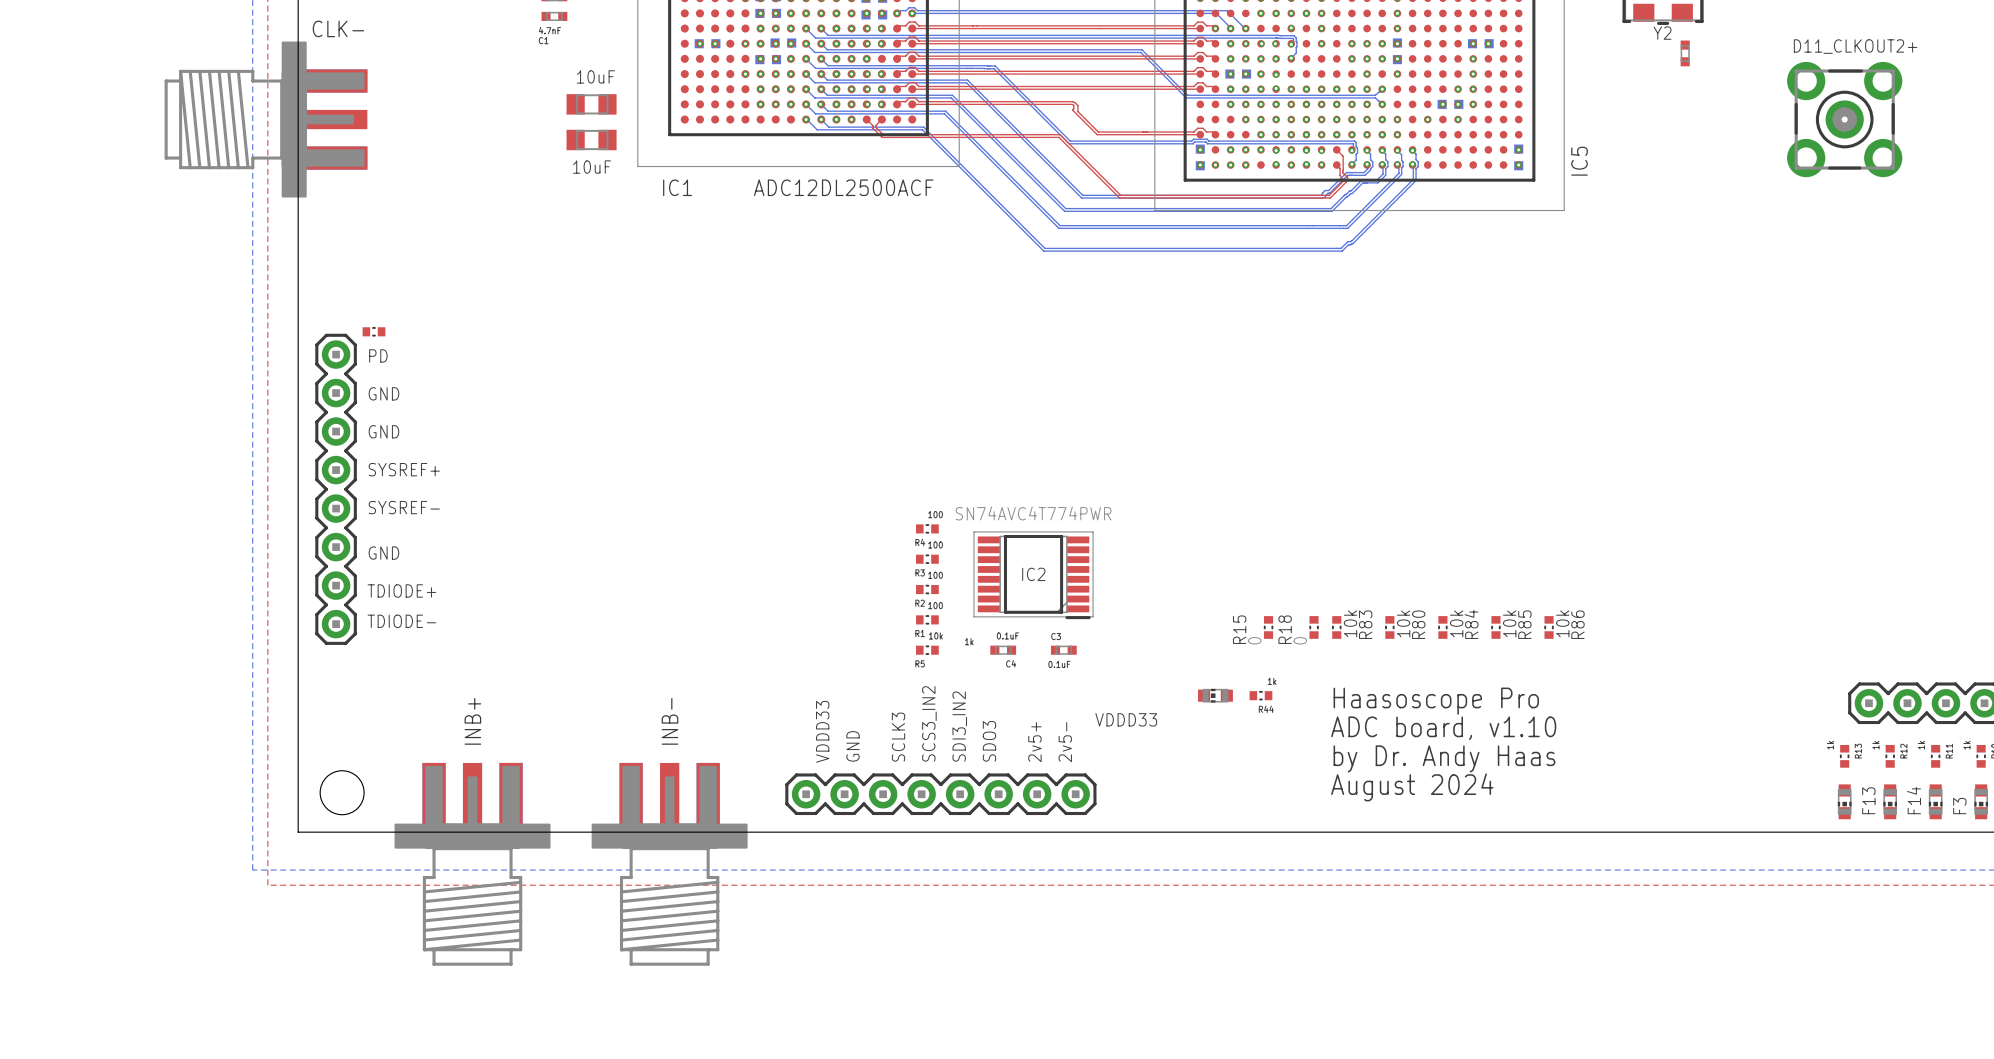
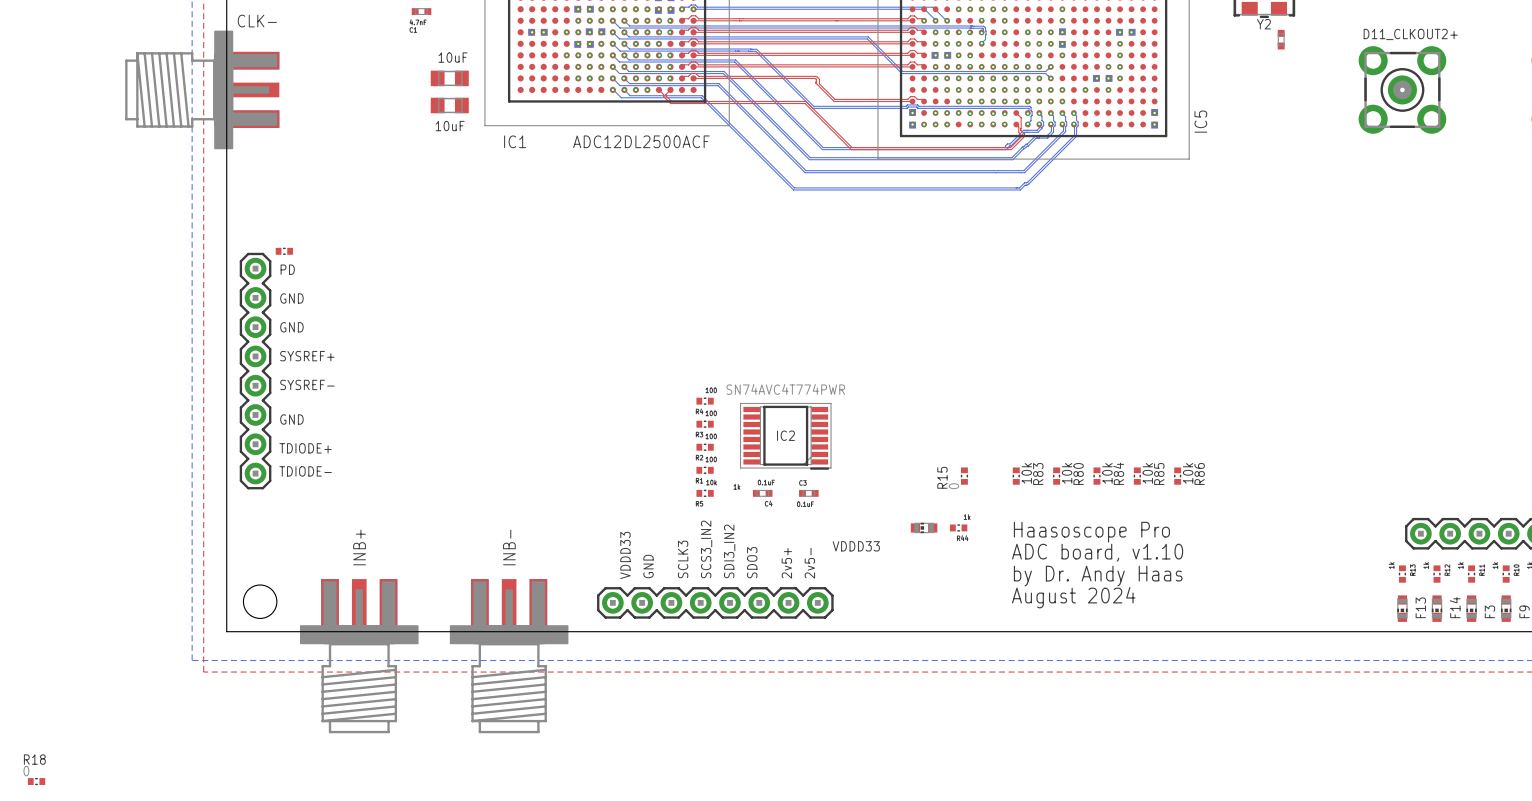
R18 rotation: 0° (1314, 627) -> 90° clockwise (36, 781)
R18 position: (1314, 627) -> (36, 781)

